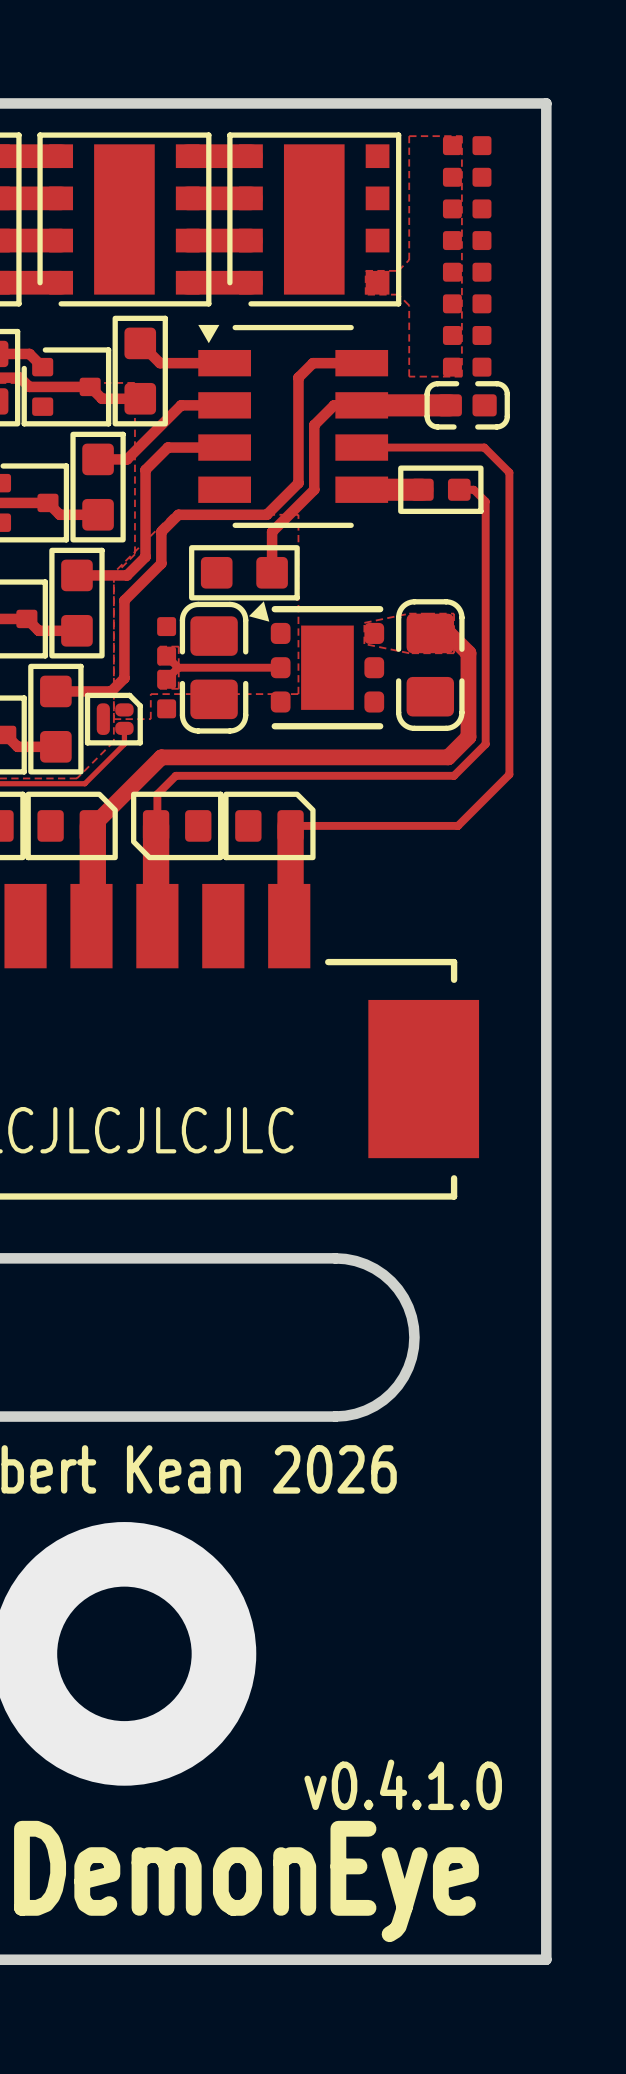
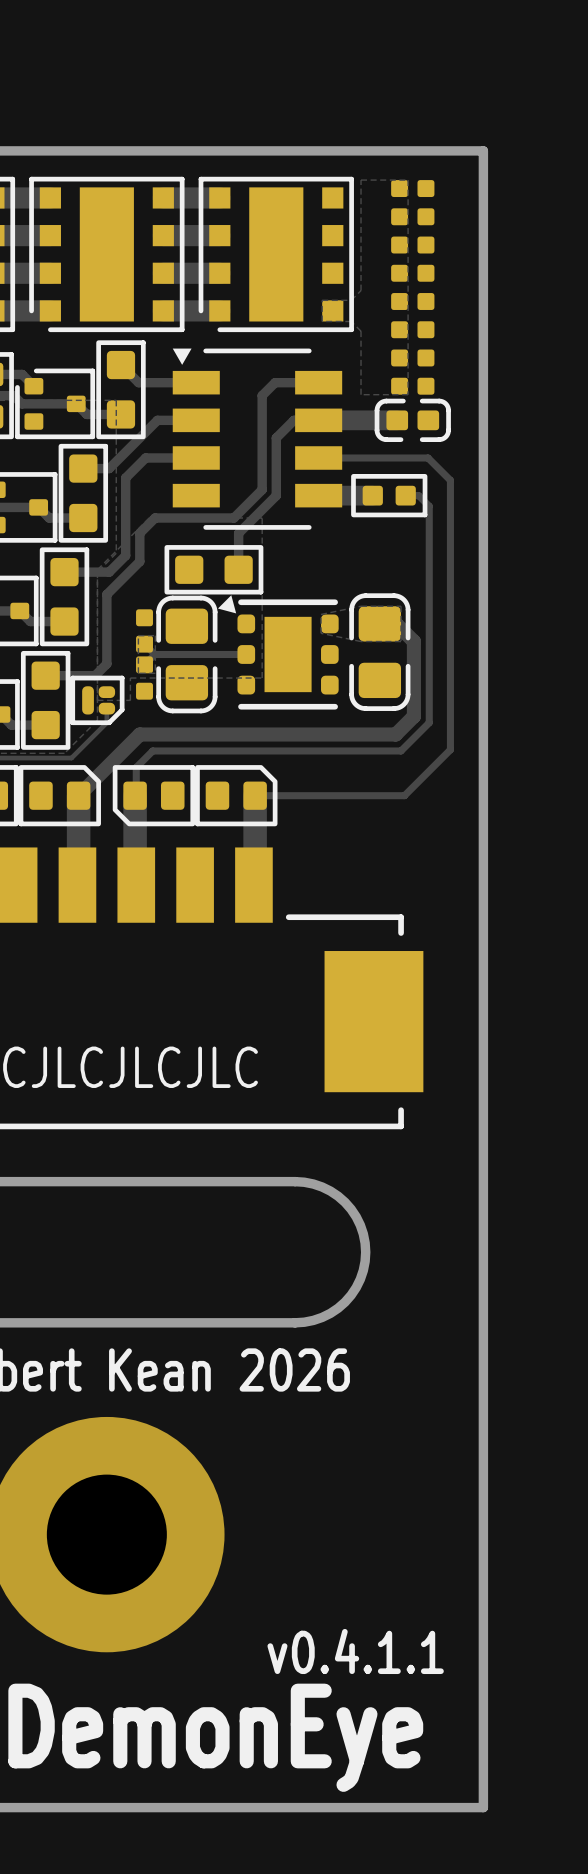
part footprint: [84, 692, 143, 746] -> [70, 675, 125, 726]
text: v0.4.1.0 (403, 1784) -> v0.4.1.1 (355, 1651)

